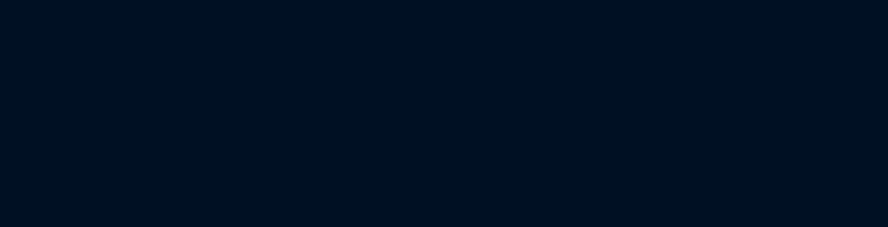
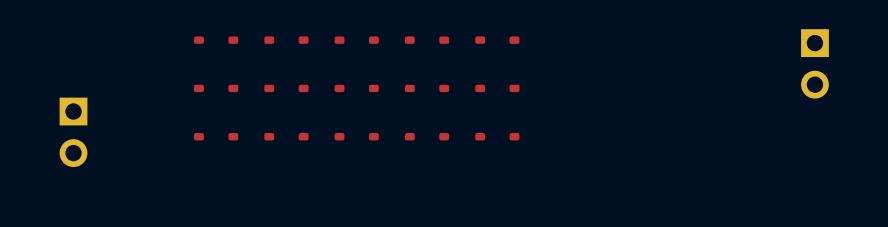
part: none -> (216, 40)
part: none -> (286, 40)
part: none -> (356, 40)
part: none -> (427, 40)
part: none -> (497, 40)
part: none -> (814, 63)
part: none -> (216, 88)
part: none -> (286, 88)
part: none -> (356, 88)
part: none -> (427, 88)
part: none -> (497, 88)
part: none -> (73, 132)
part: none -> (216, 136)
part: none -> (286, 136)
part: none -> (356, 136)
part: none -> (427, 136)
part: none -> (497, 136)

